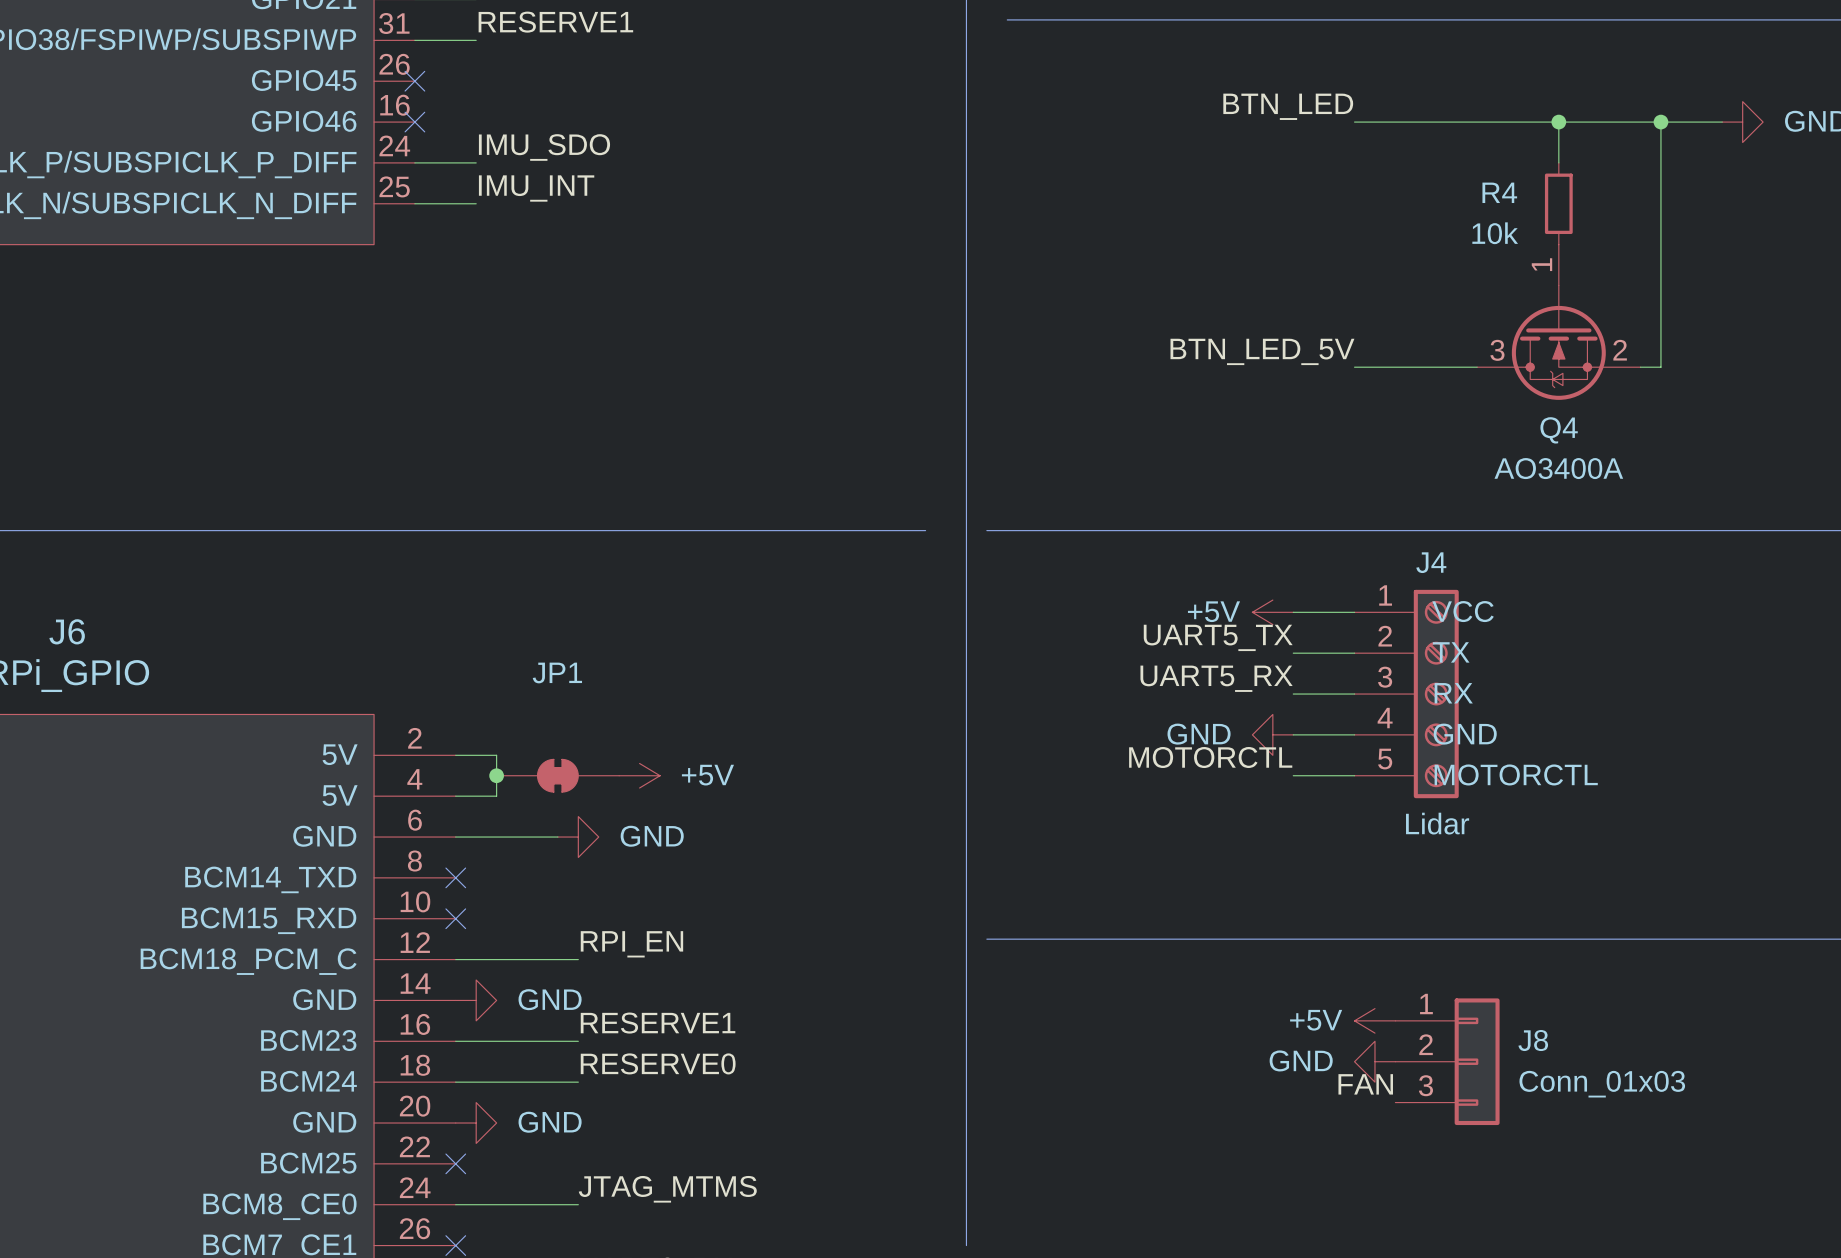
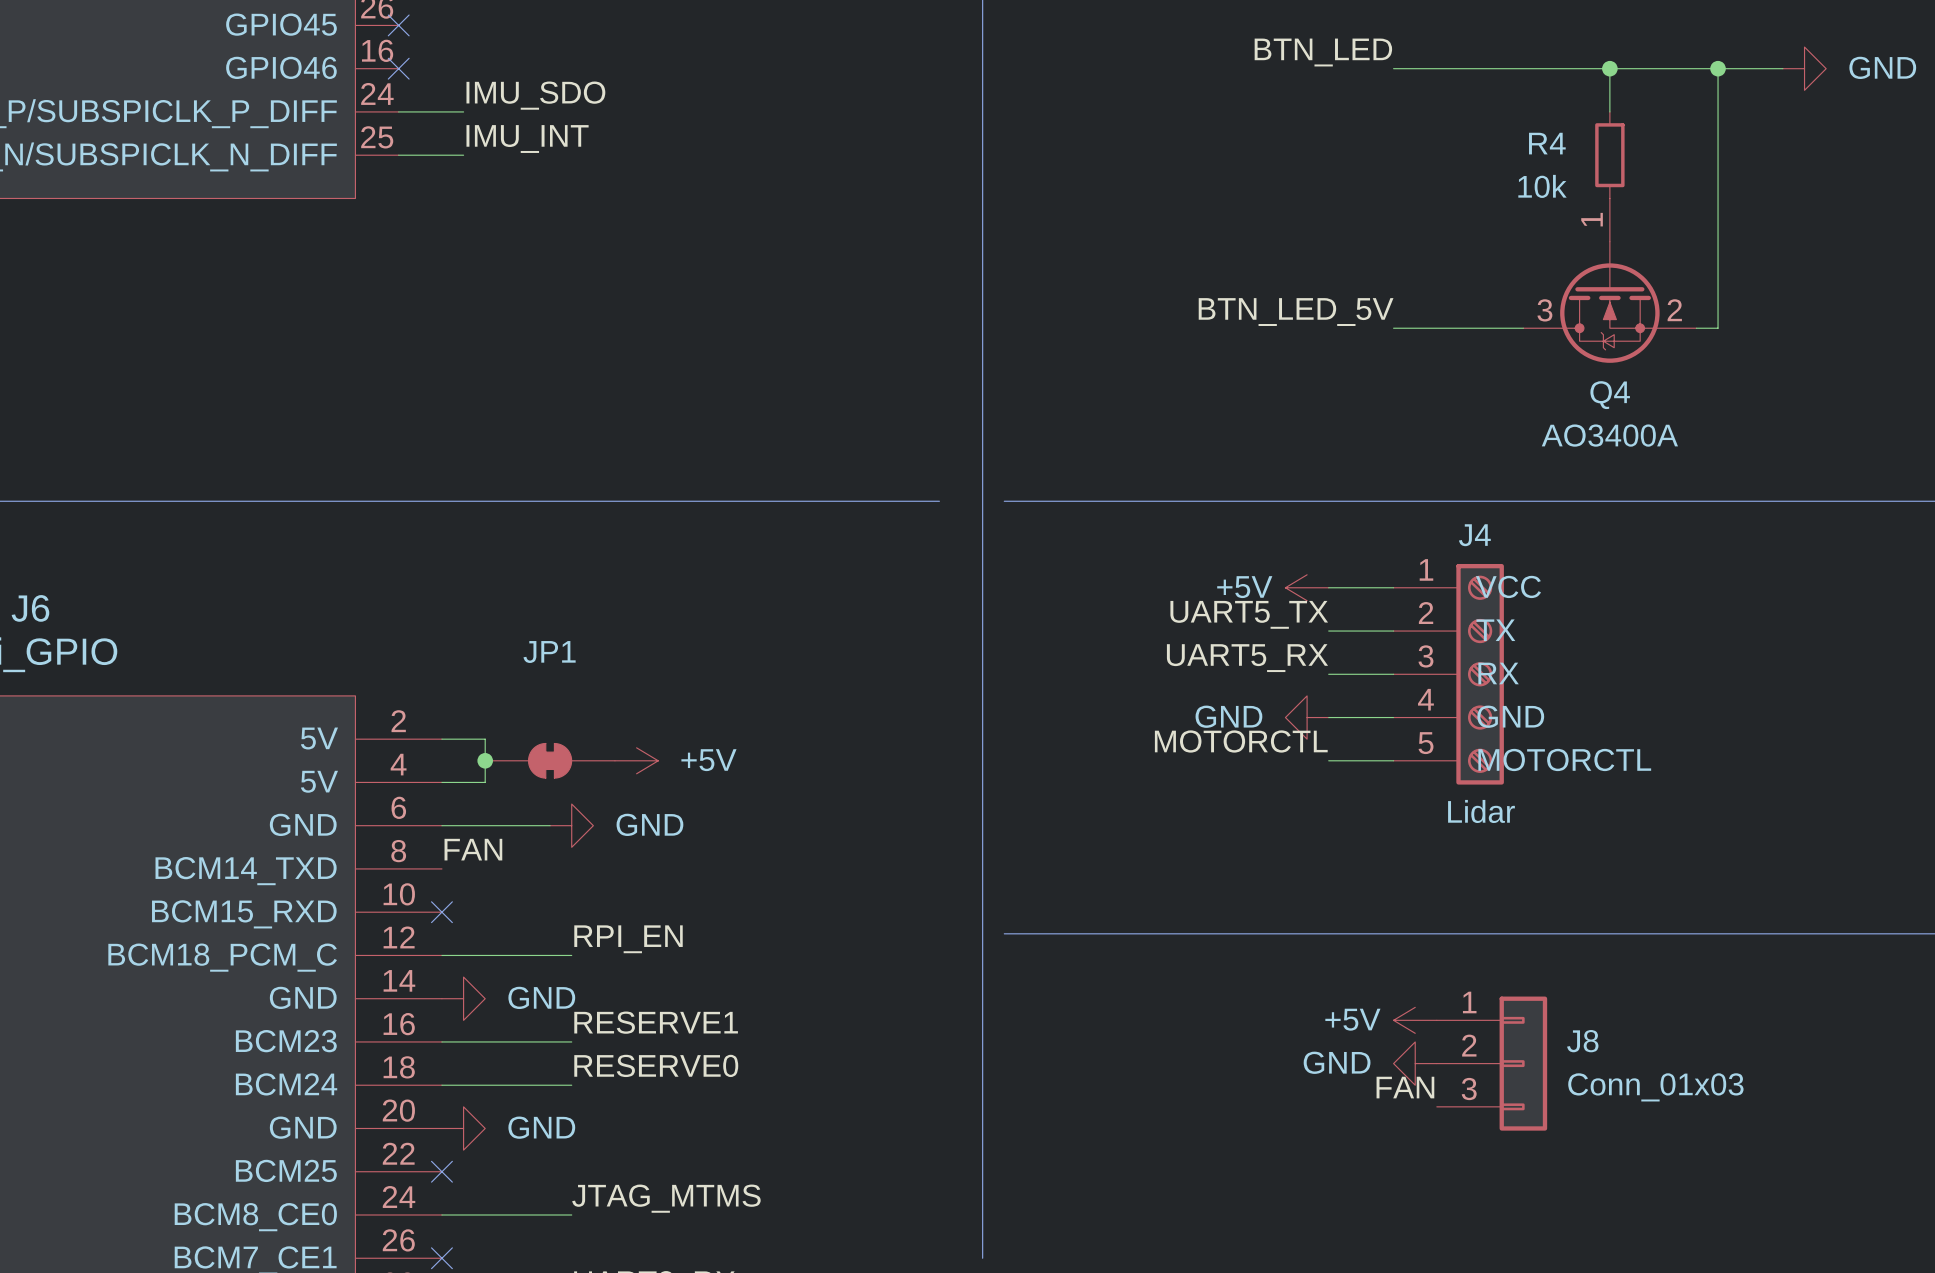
label: none -> FAN (473, 849)
no-connect mark: (455, 877) -> none

